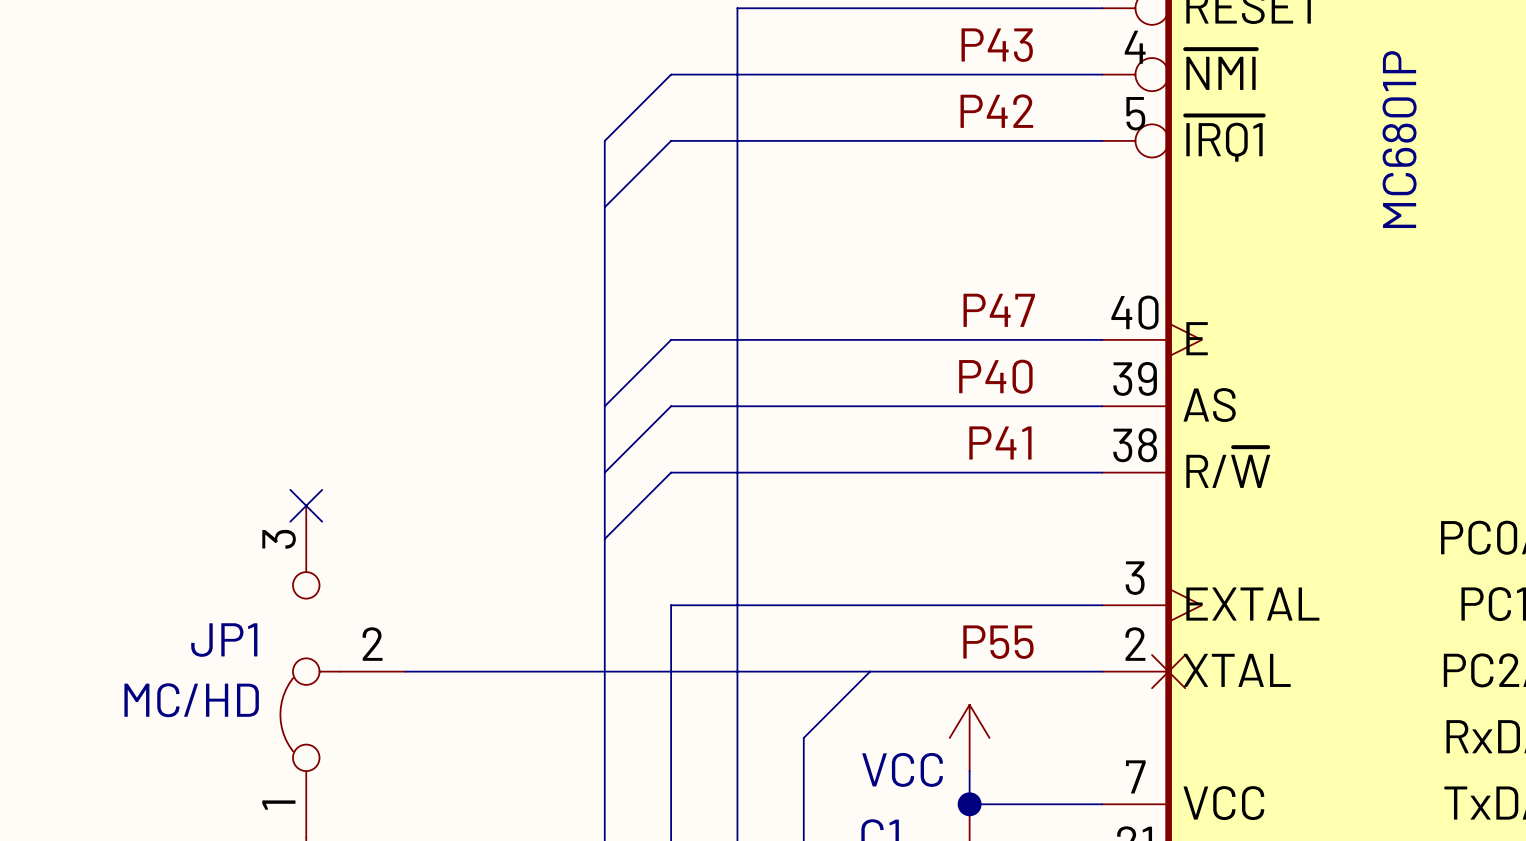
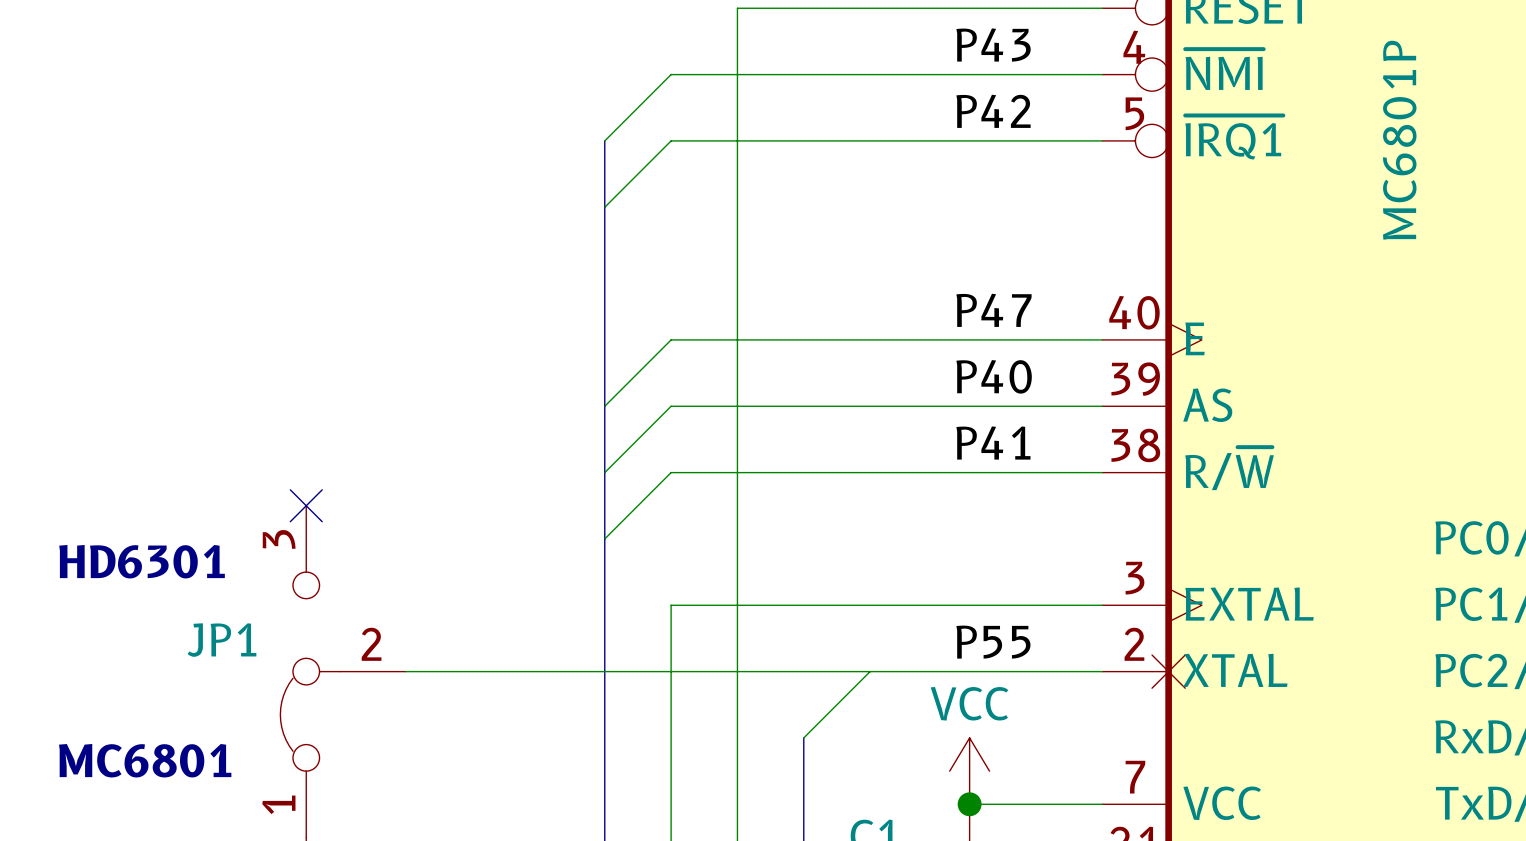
text: none -> HD6301 (142, 561)
JP1 value: MC/HD (191, 700) -> none
power symbol position: VCC (969, 737) -> VCC (969, 771)
text: none -> MC6801 (145, 760)
power symbol text position: VCC (902, 769) -> VCC (969, 703)

